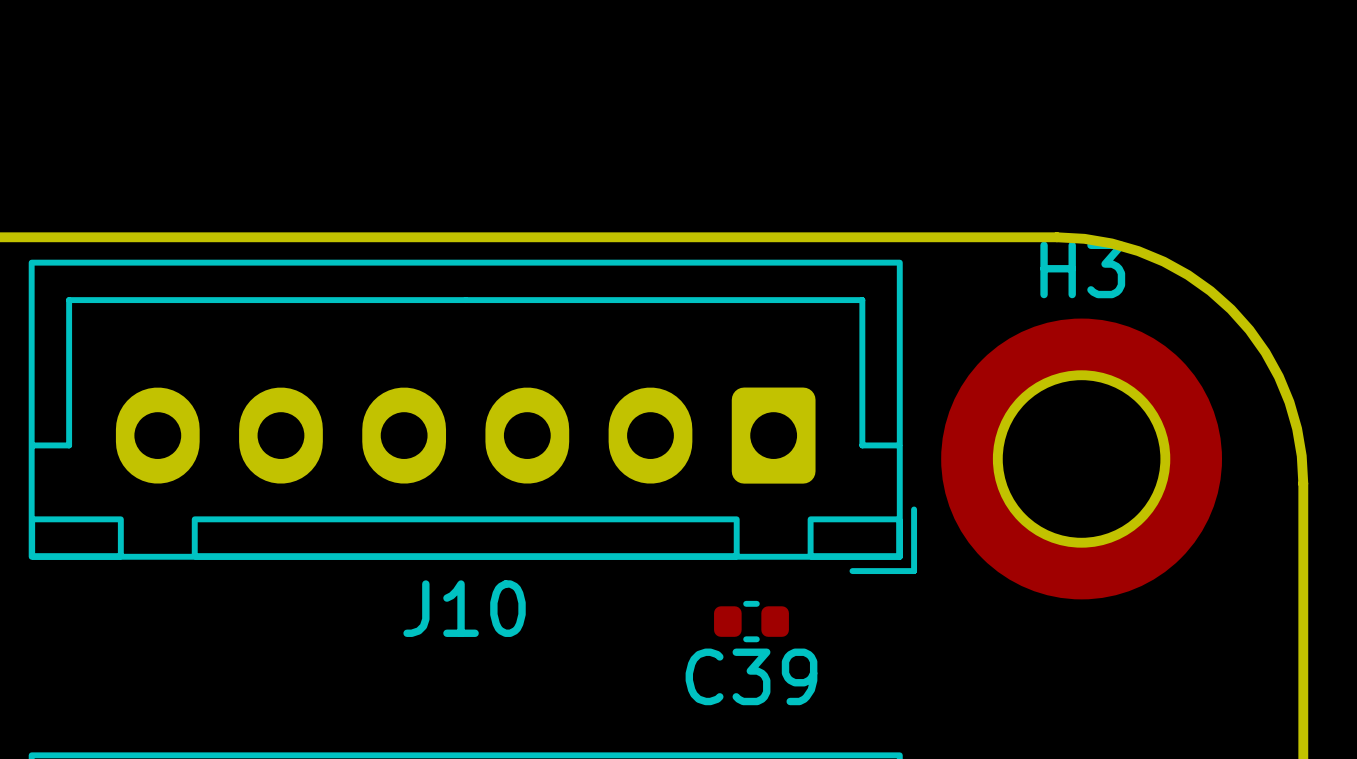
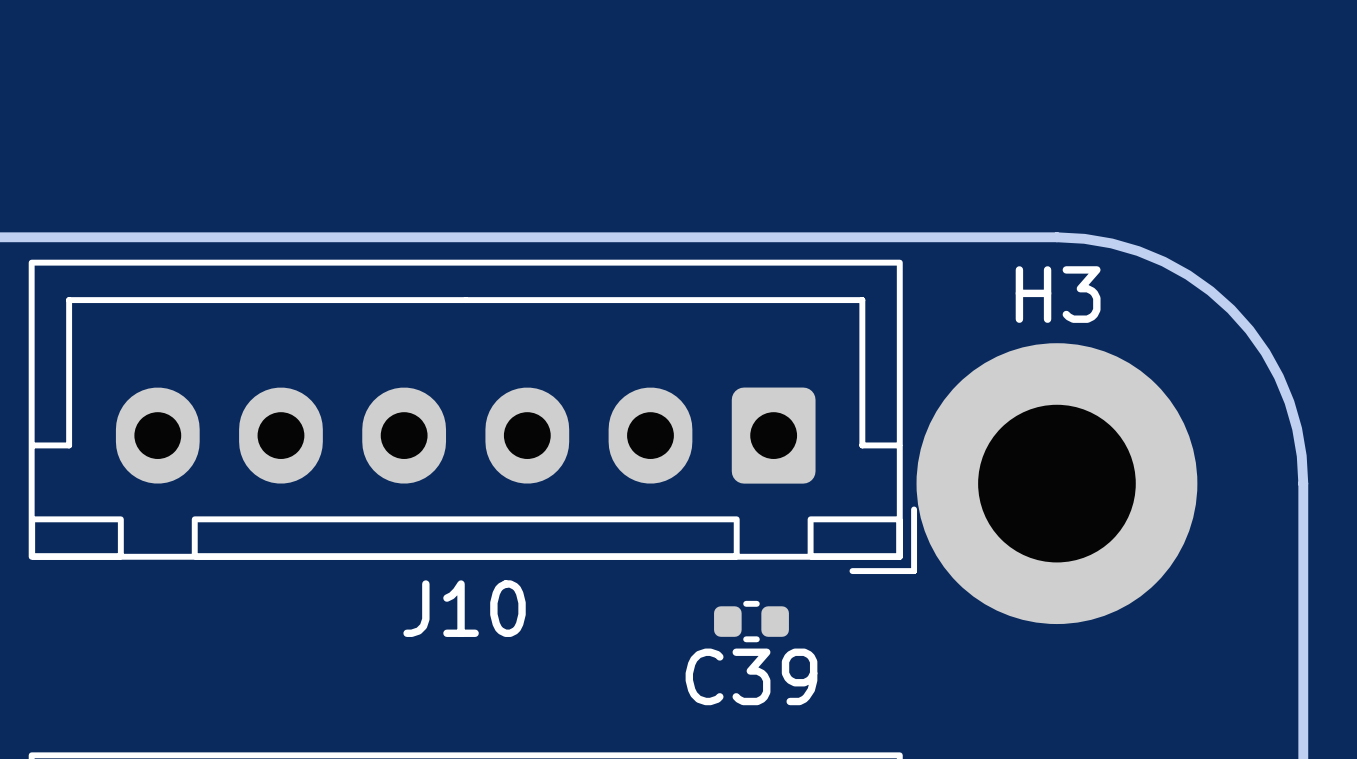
H3 position: (1081, 458) -> (1056, 483)

